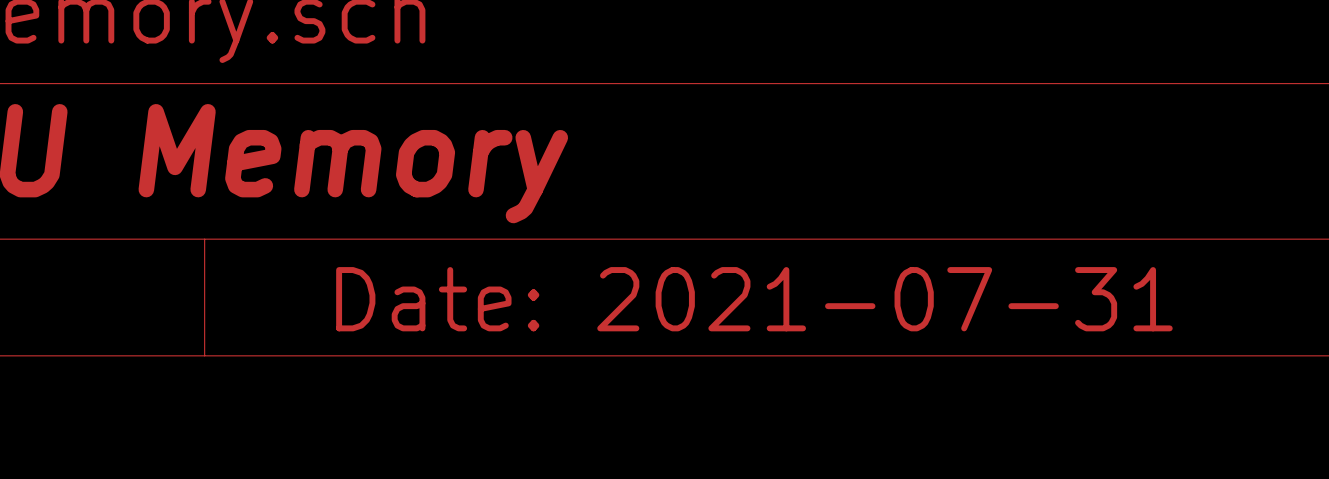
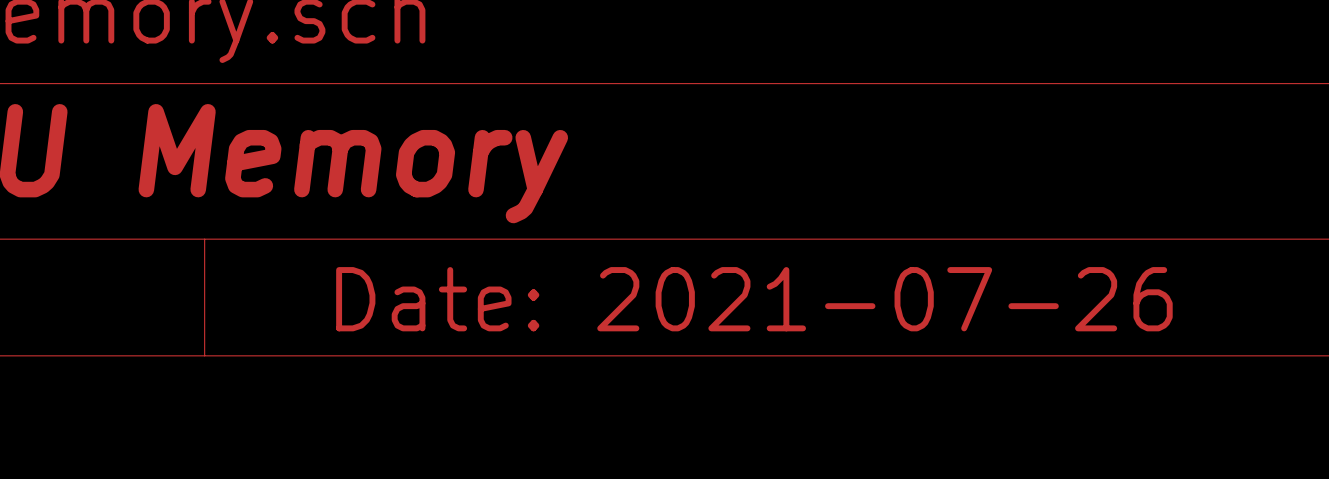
title block: Date: 2021-07-31 (754, 299) -> Date: 2021-07-26 (754, 299)

